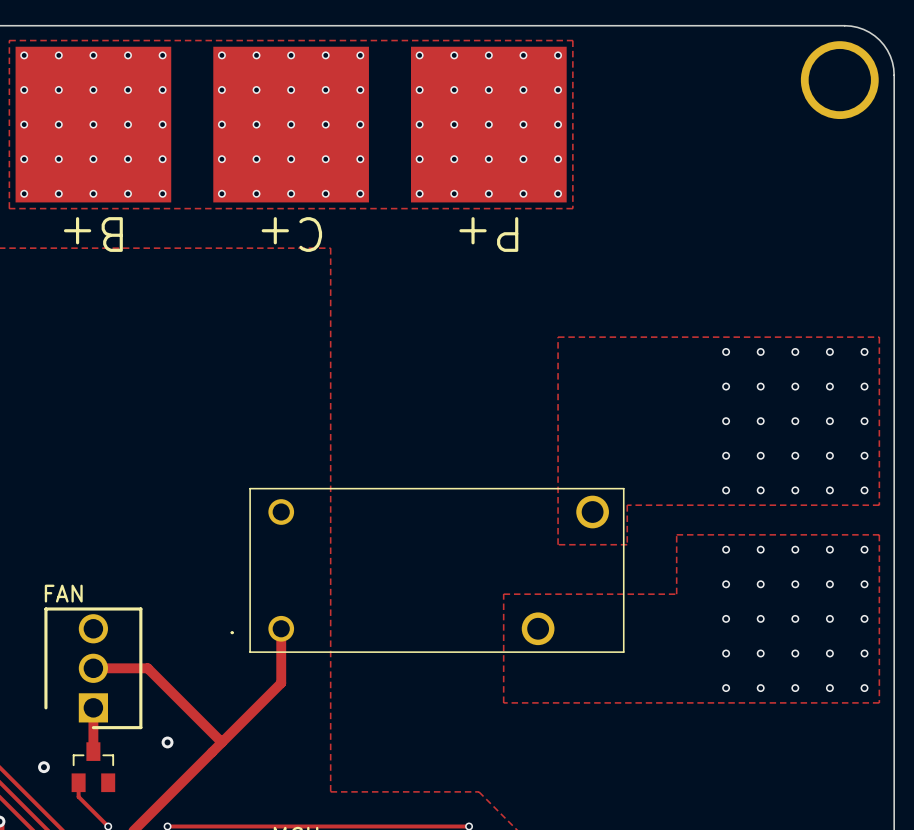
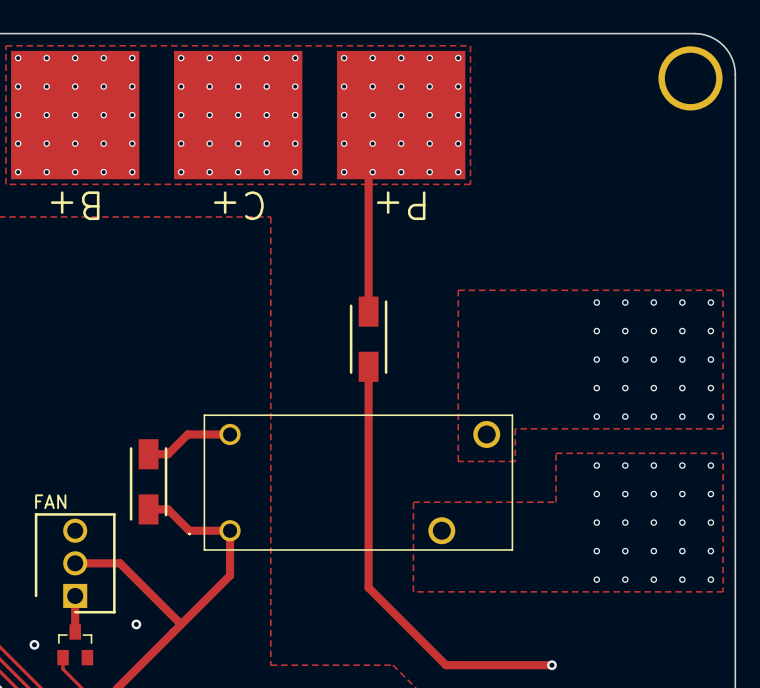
track: none -> (368, 180) (368, 311)
part: none -> (368, 339)
track: none -> (368, 366) (368, 587) (446, 665) (551, 665)
track: none -> (230, 434) (187, 434) (168, 454) (148, 454)
part: none -> (148, 481)
track: none -> (148, 509) (168, 509) (189, 530) (230, 530)
via: none -> (551, 665)

